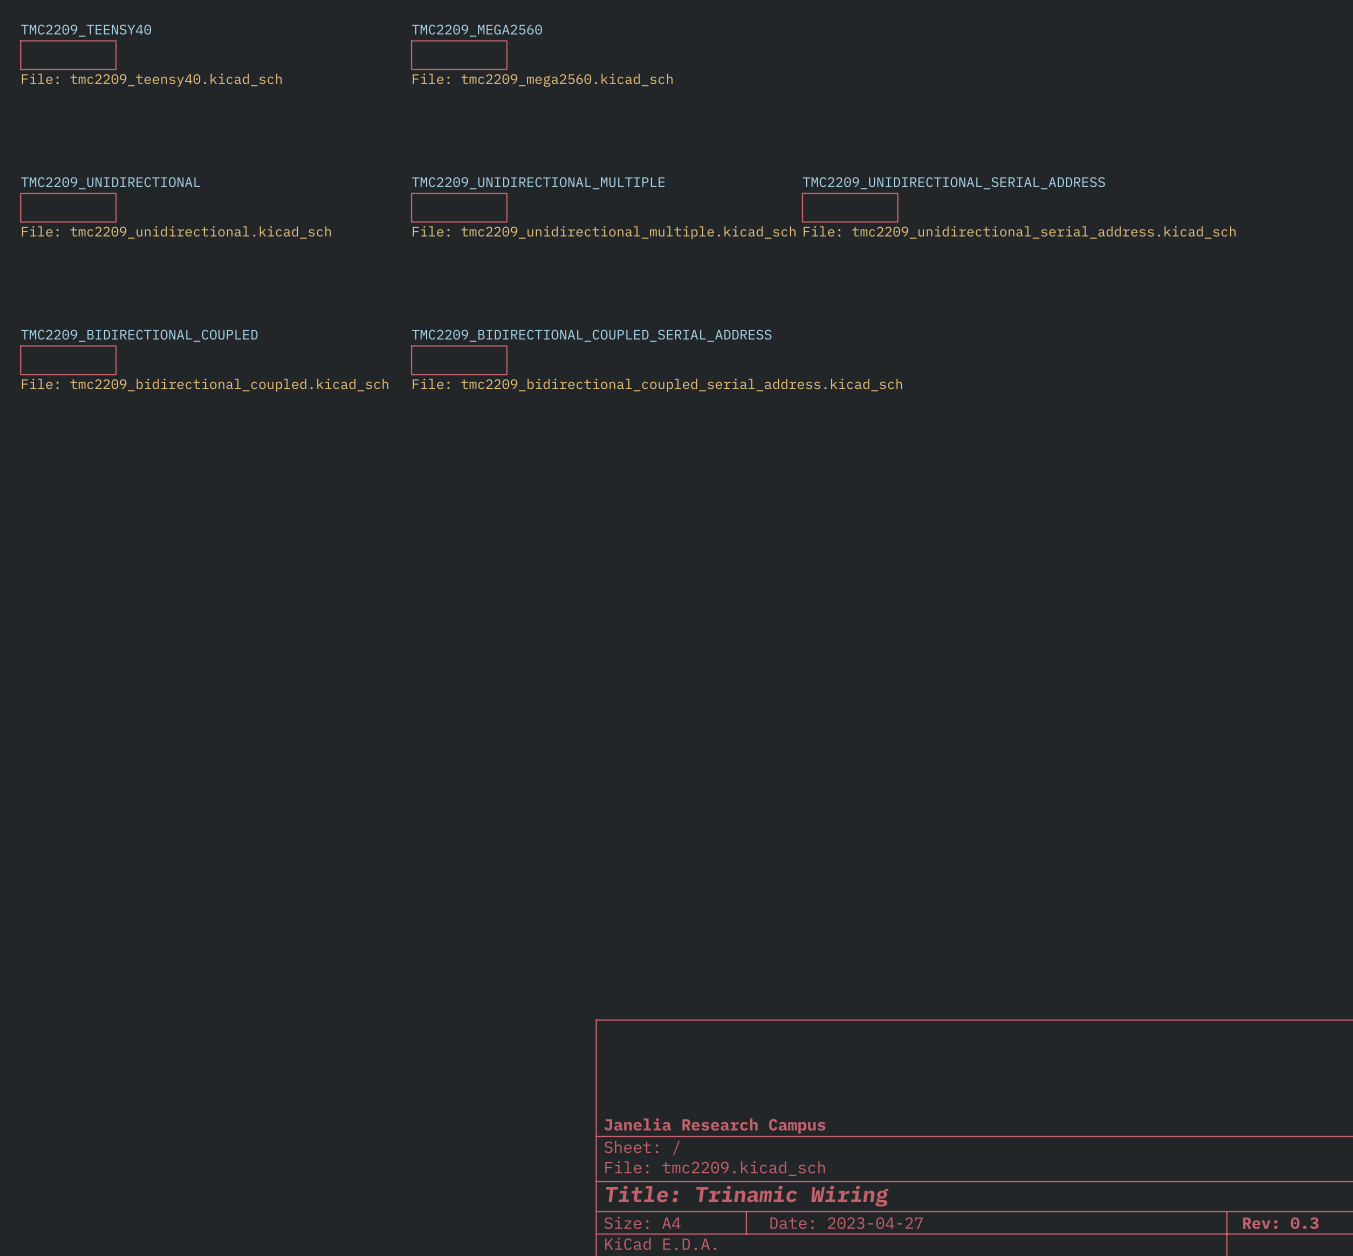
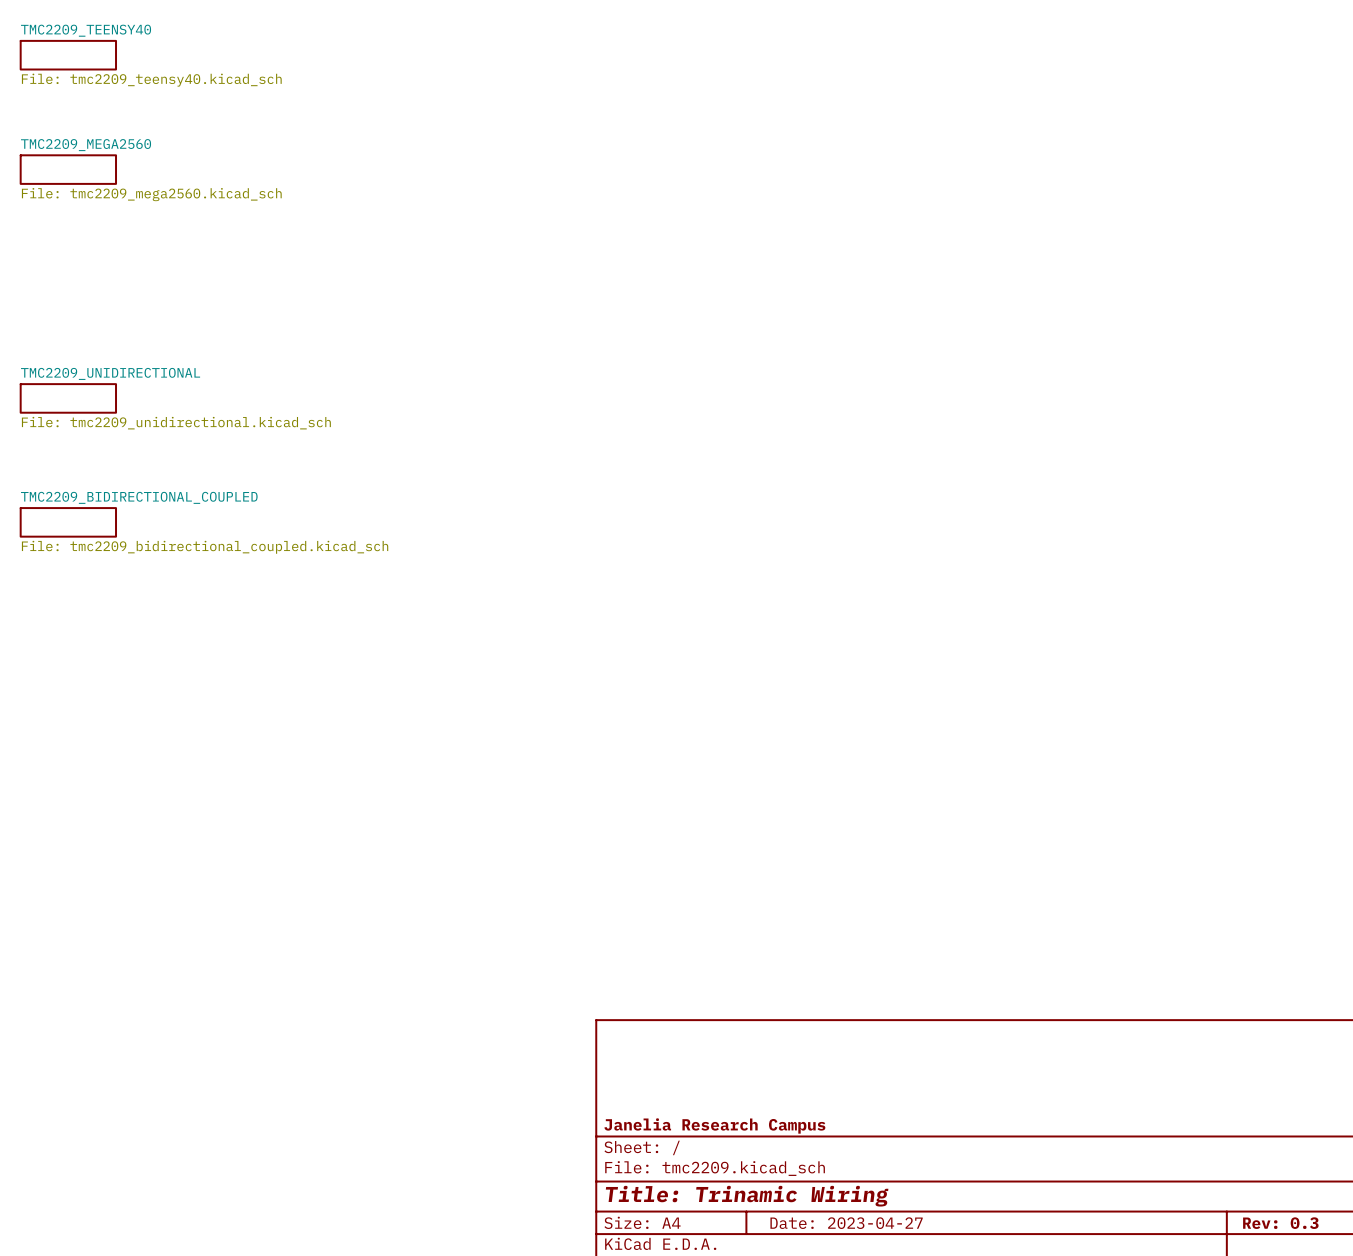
sheet TMC2209_MEGA2560 position: (459, 55) -> (68, 169)
sheet TMC2209_UNIDIRECTIONAL position: (68, 207) -> (68, 398)
sheet TMC2209_UNIDIRECTIONAL_MULTIPLE: File: tmc2209_unidirectional_multiple.kicad_sch (459, 207) -> none
sheet TMC2209_UNIDIRECTIONAL_SERIAL_ADDRESS: File: tmc2209_unidirectional_serial_address.kicad_sch (850, 207) -> none
sheet TMC2209_BIDIRECTIONAL_COUPLED position: (68, 360) -> (68, 522)
sheet TMC2209_BIDIRECTIONAL_COUPLED_SERIAL_ADDRESS: File: tmc2209_bidirectional_coupled_serial_address.kicad_sch (459, 360) -> none

